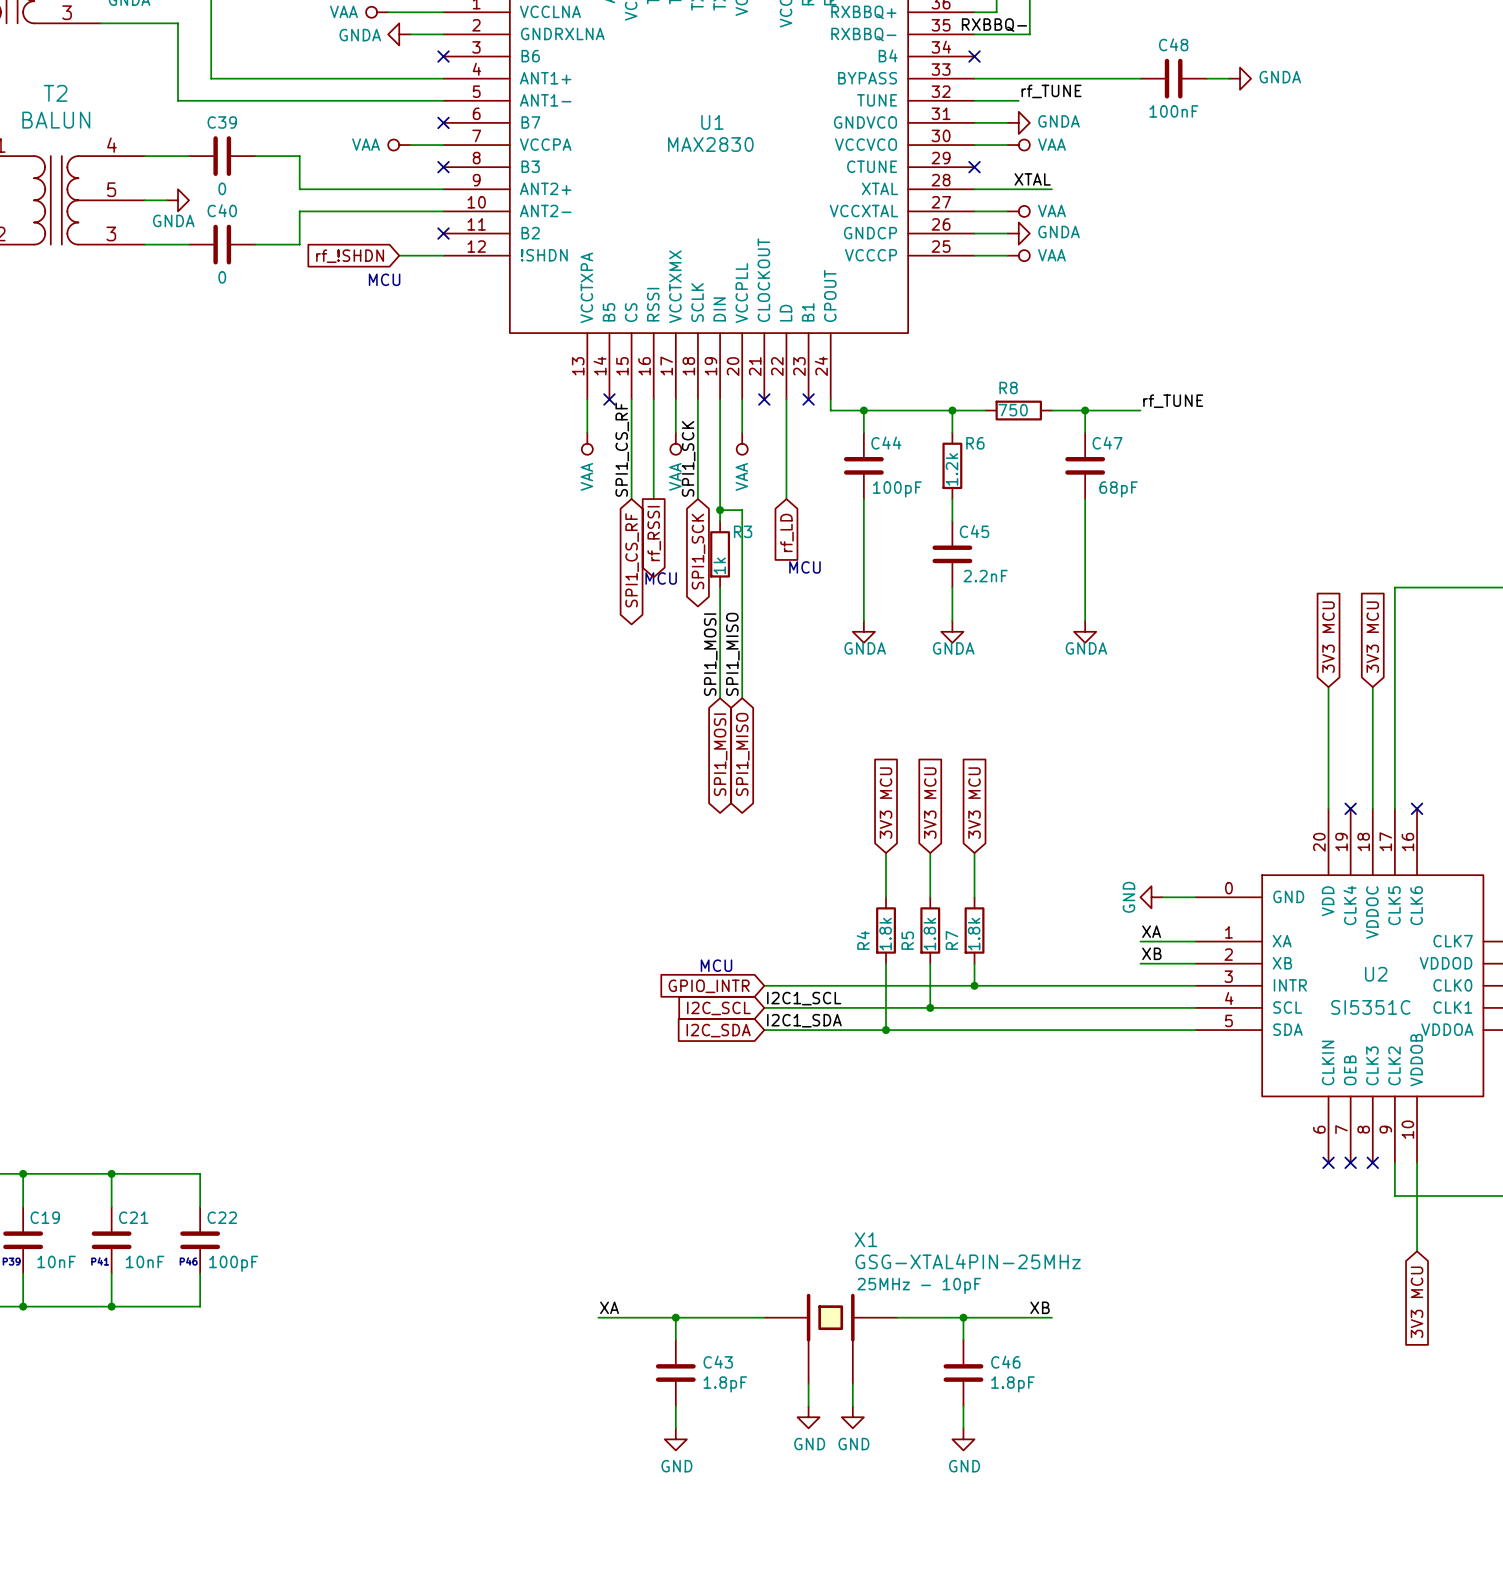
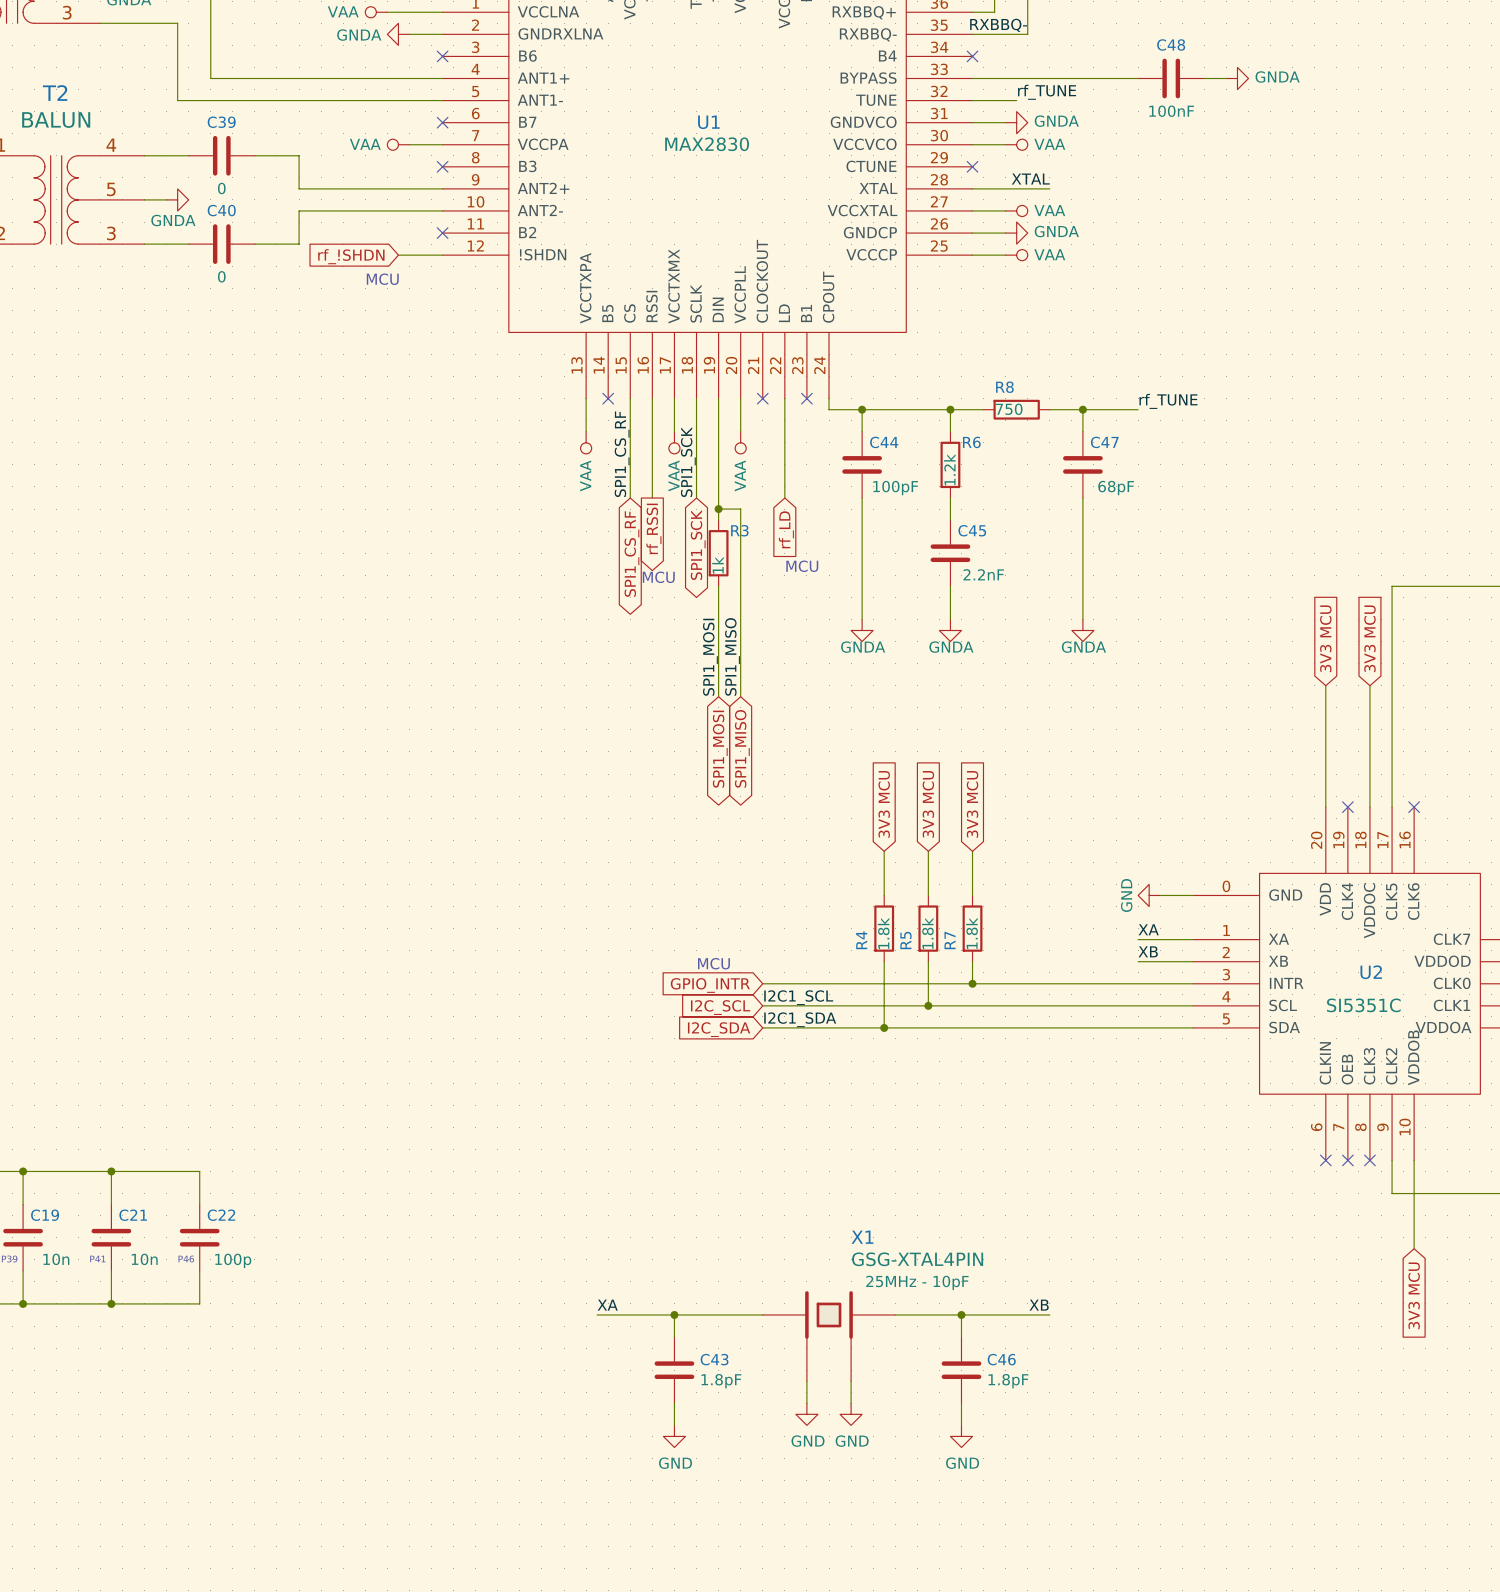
C19 value: 10nF (56, 1261) -> 10n (56, 1259)
C21 value: 10nF (145, 1261) -> 10n (144, 1259)
X1 value: GSG-XTAL4PIN-25MHz (968, 1261) -> GSG-XTAL4PIN (917, 1259)
C22 value: 100pF (233, 1263) -> 100p (233, 1260)

